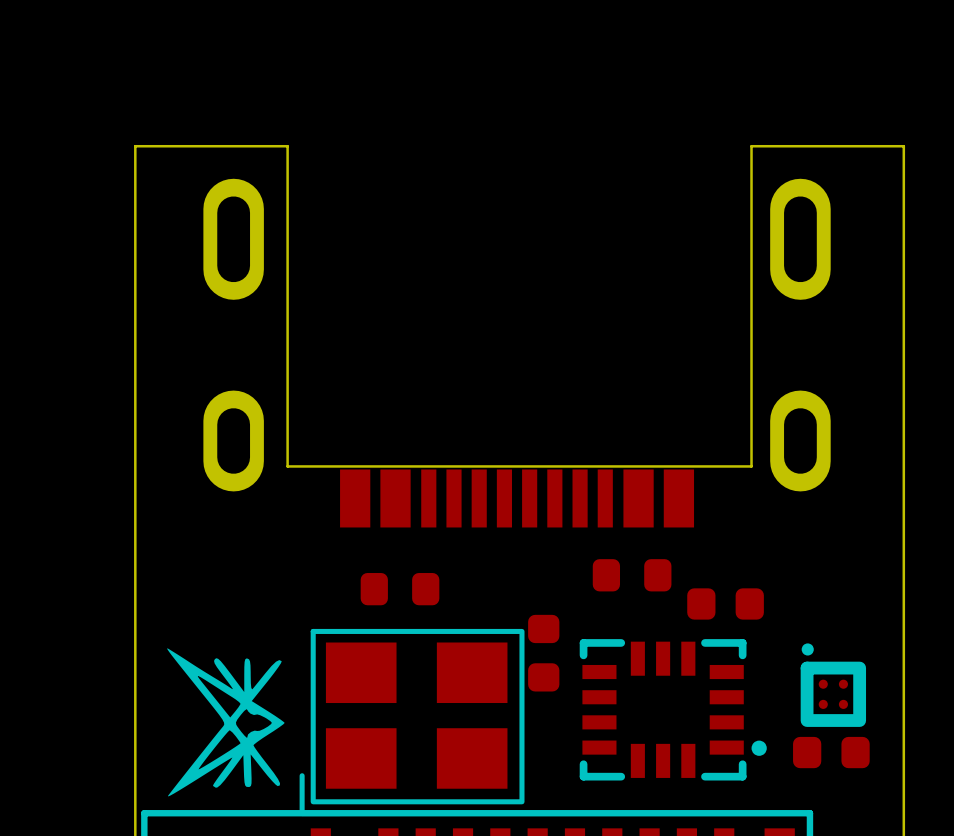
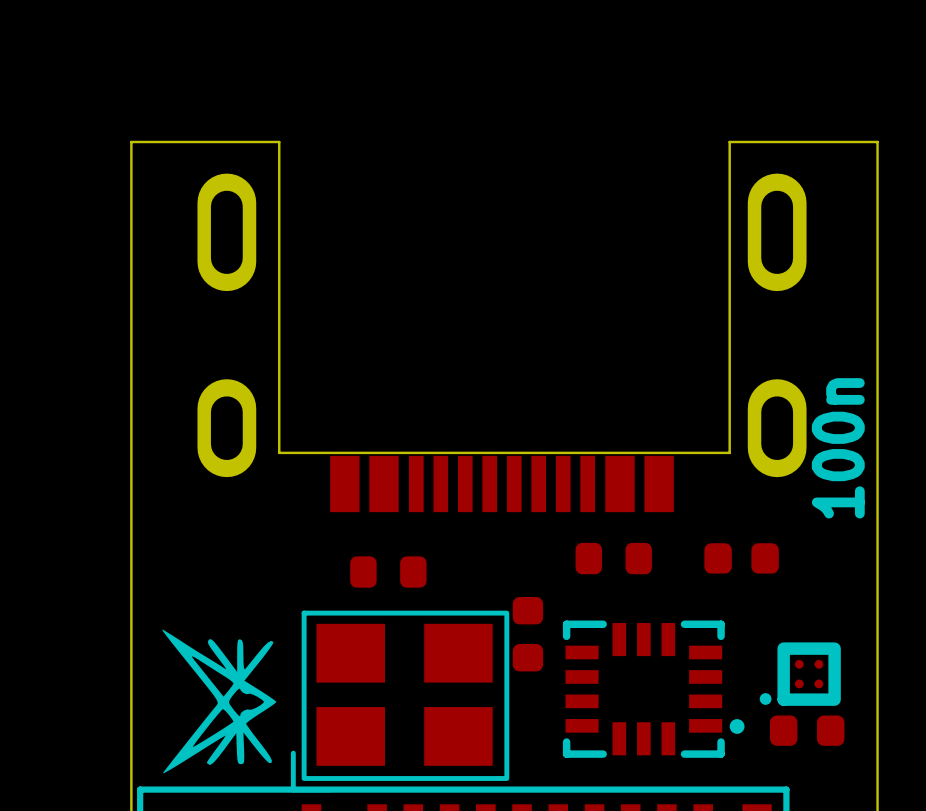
text: none -> 100n (838, 448)
part position: (725, 603) -> (741, 558)
part rotation: 0° (833, 685) -> 90° counterclockwise (800, 674)

